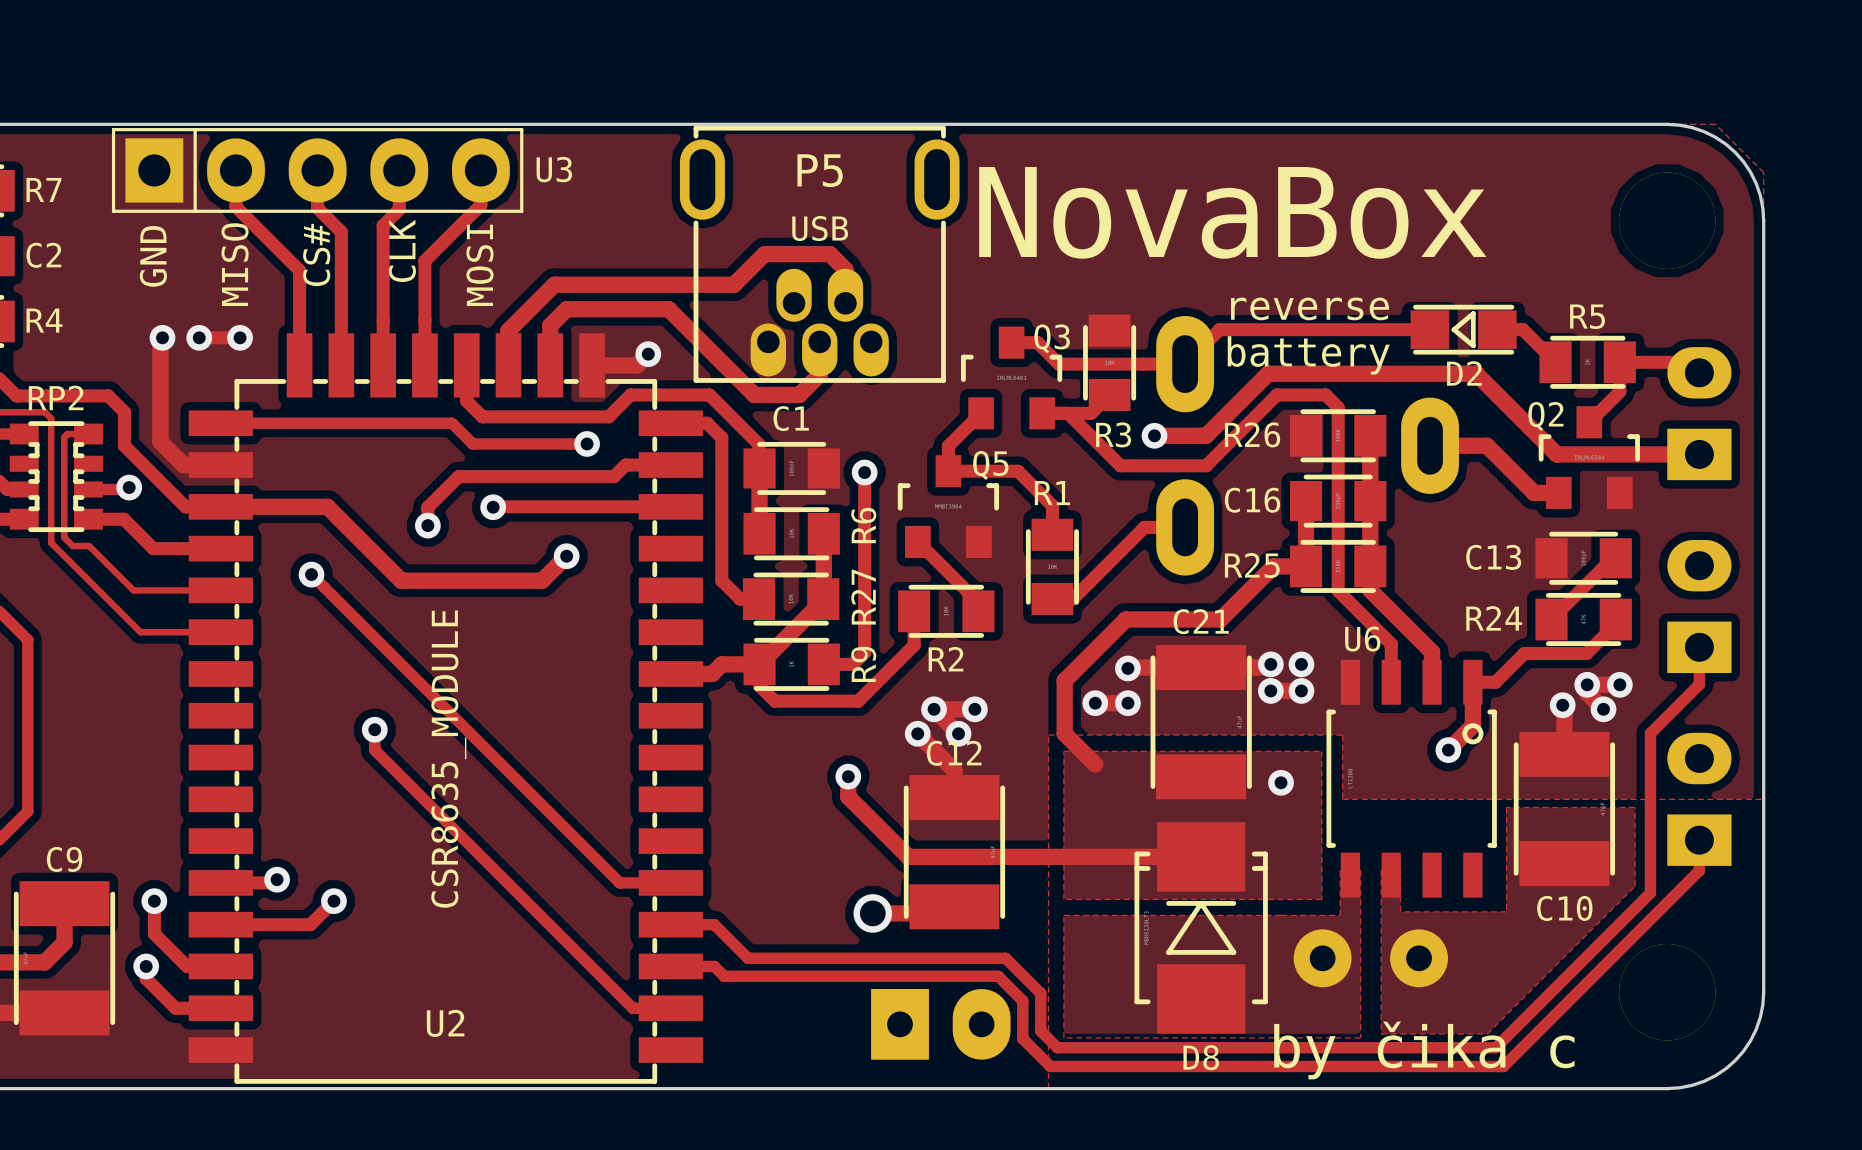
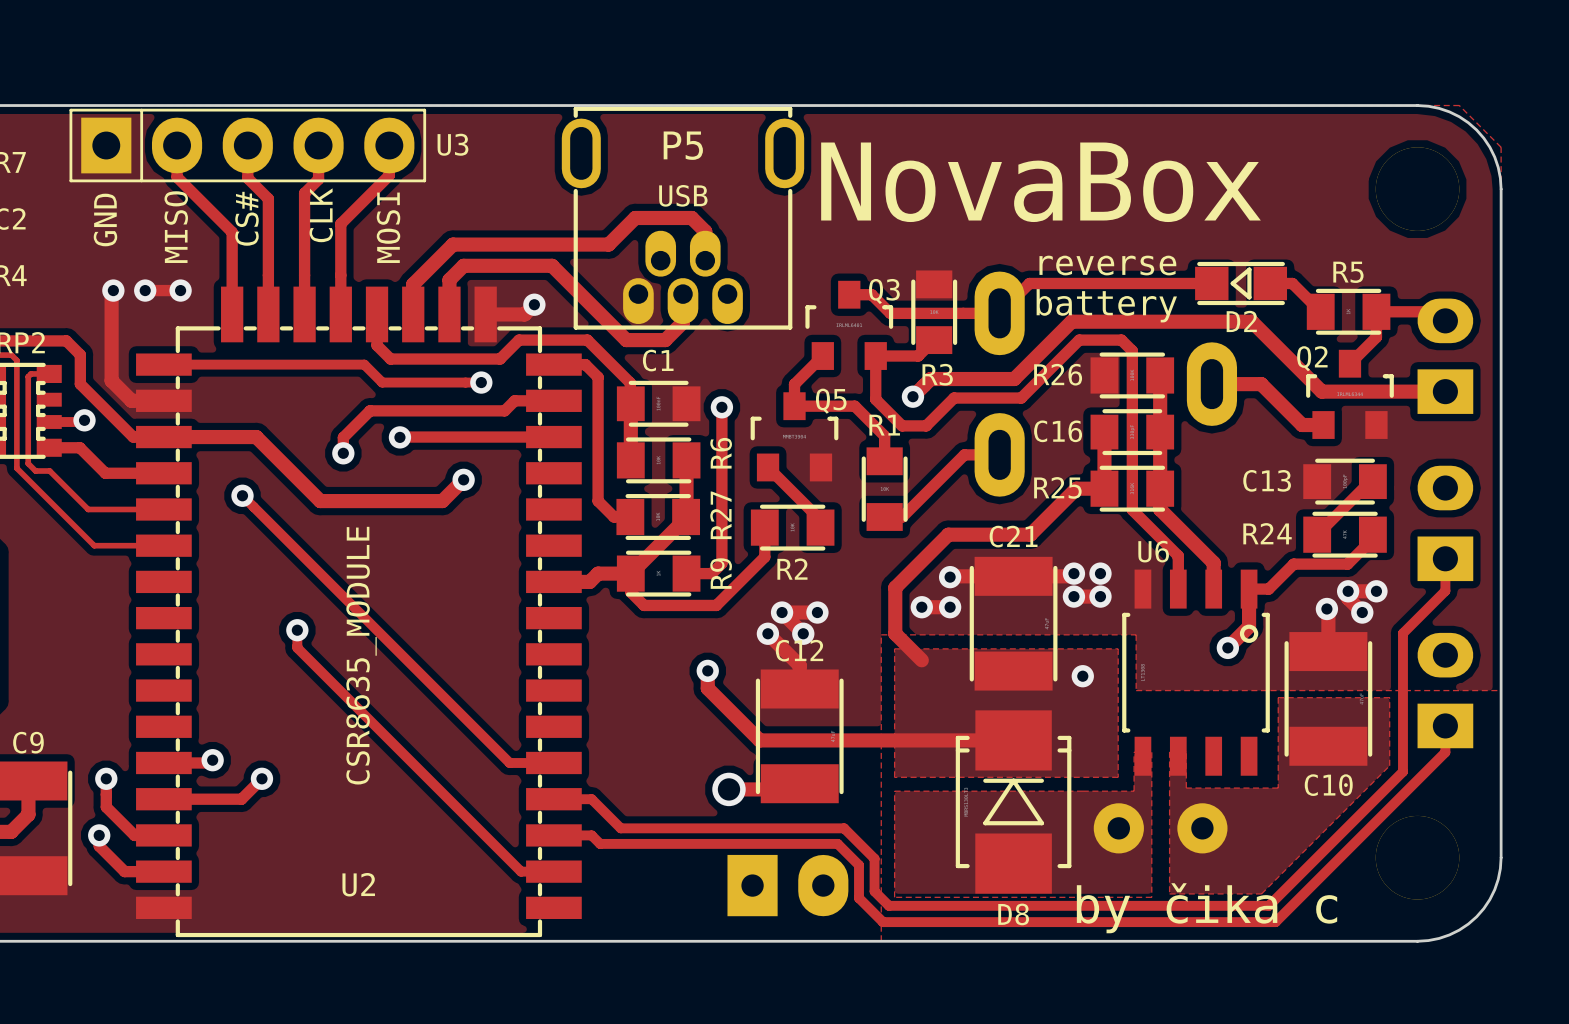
track: (1068, 413) (1120, 465) (1206, 465) (1210, 461) -> (875, 356) (875, 399) (902, 425) (926, 425) (954, 398) (1021, 398)
track: (1154, 435) (1206, 435) -> (912, 396) (930, 379) (1014, 379) (1017, 375)
via position: (1154, 435) -> (912, 396)

